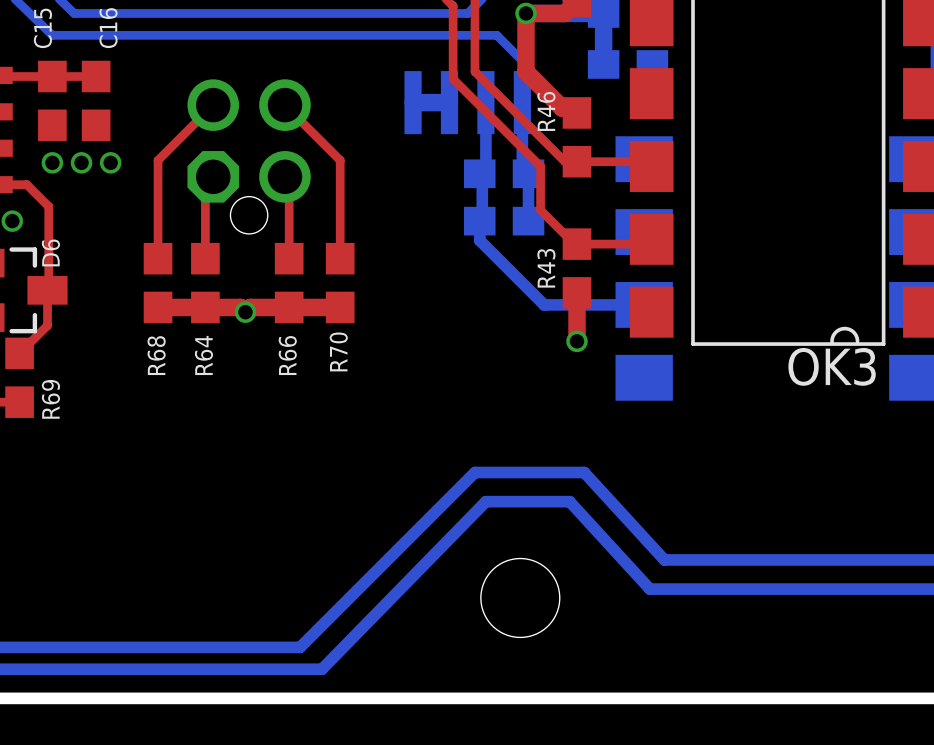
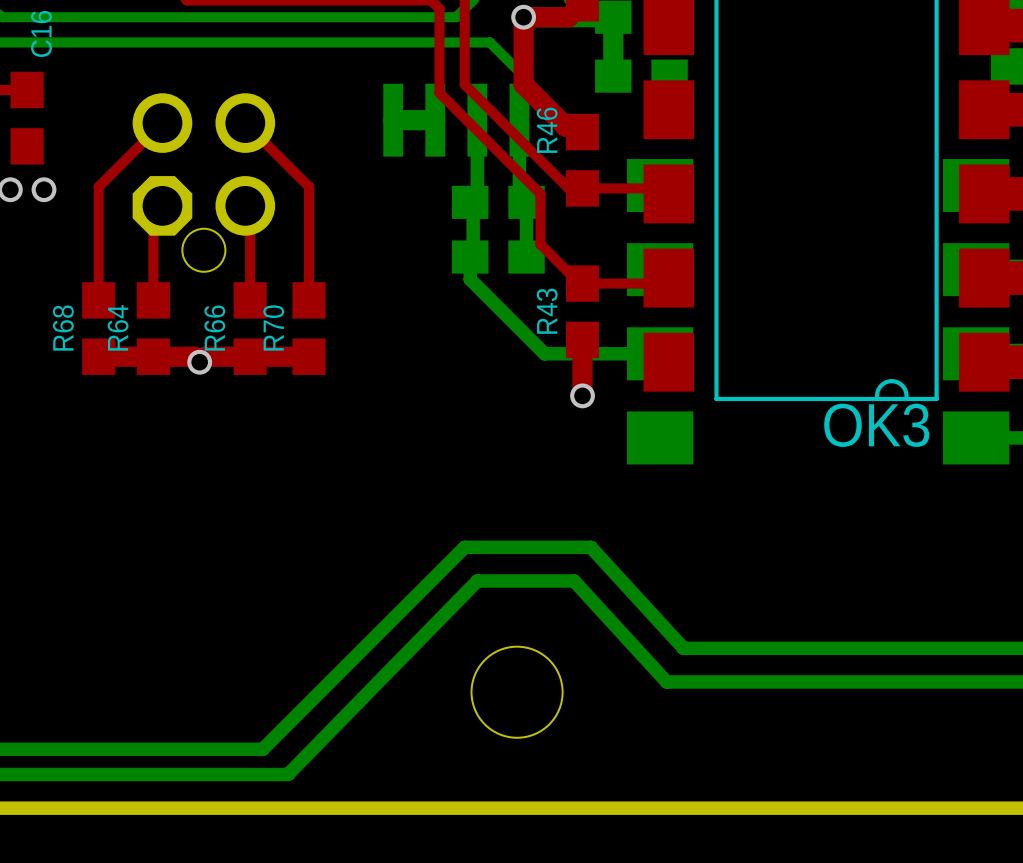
R70 name position: R70 (338, 351) -> R70 (273, 327)
R68 name position: R68 (156, 355) -> R68 (63, 328)
R64 name position: R64 (203, 355) -> R64 (118, 327)
R66 name position: R66 (287, 355) -> R66 (214, 328)

